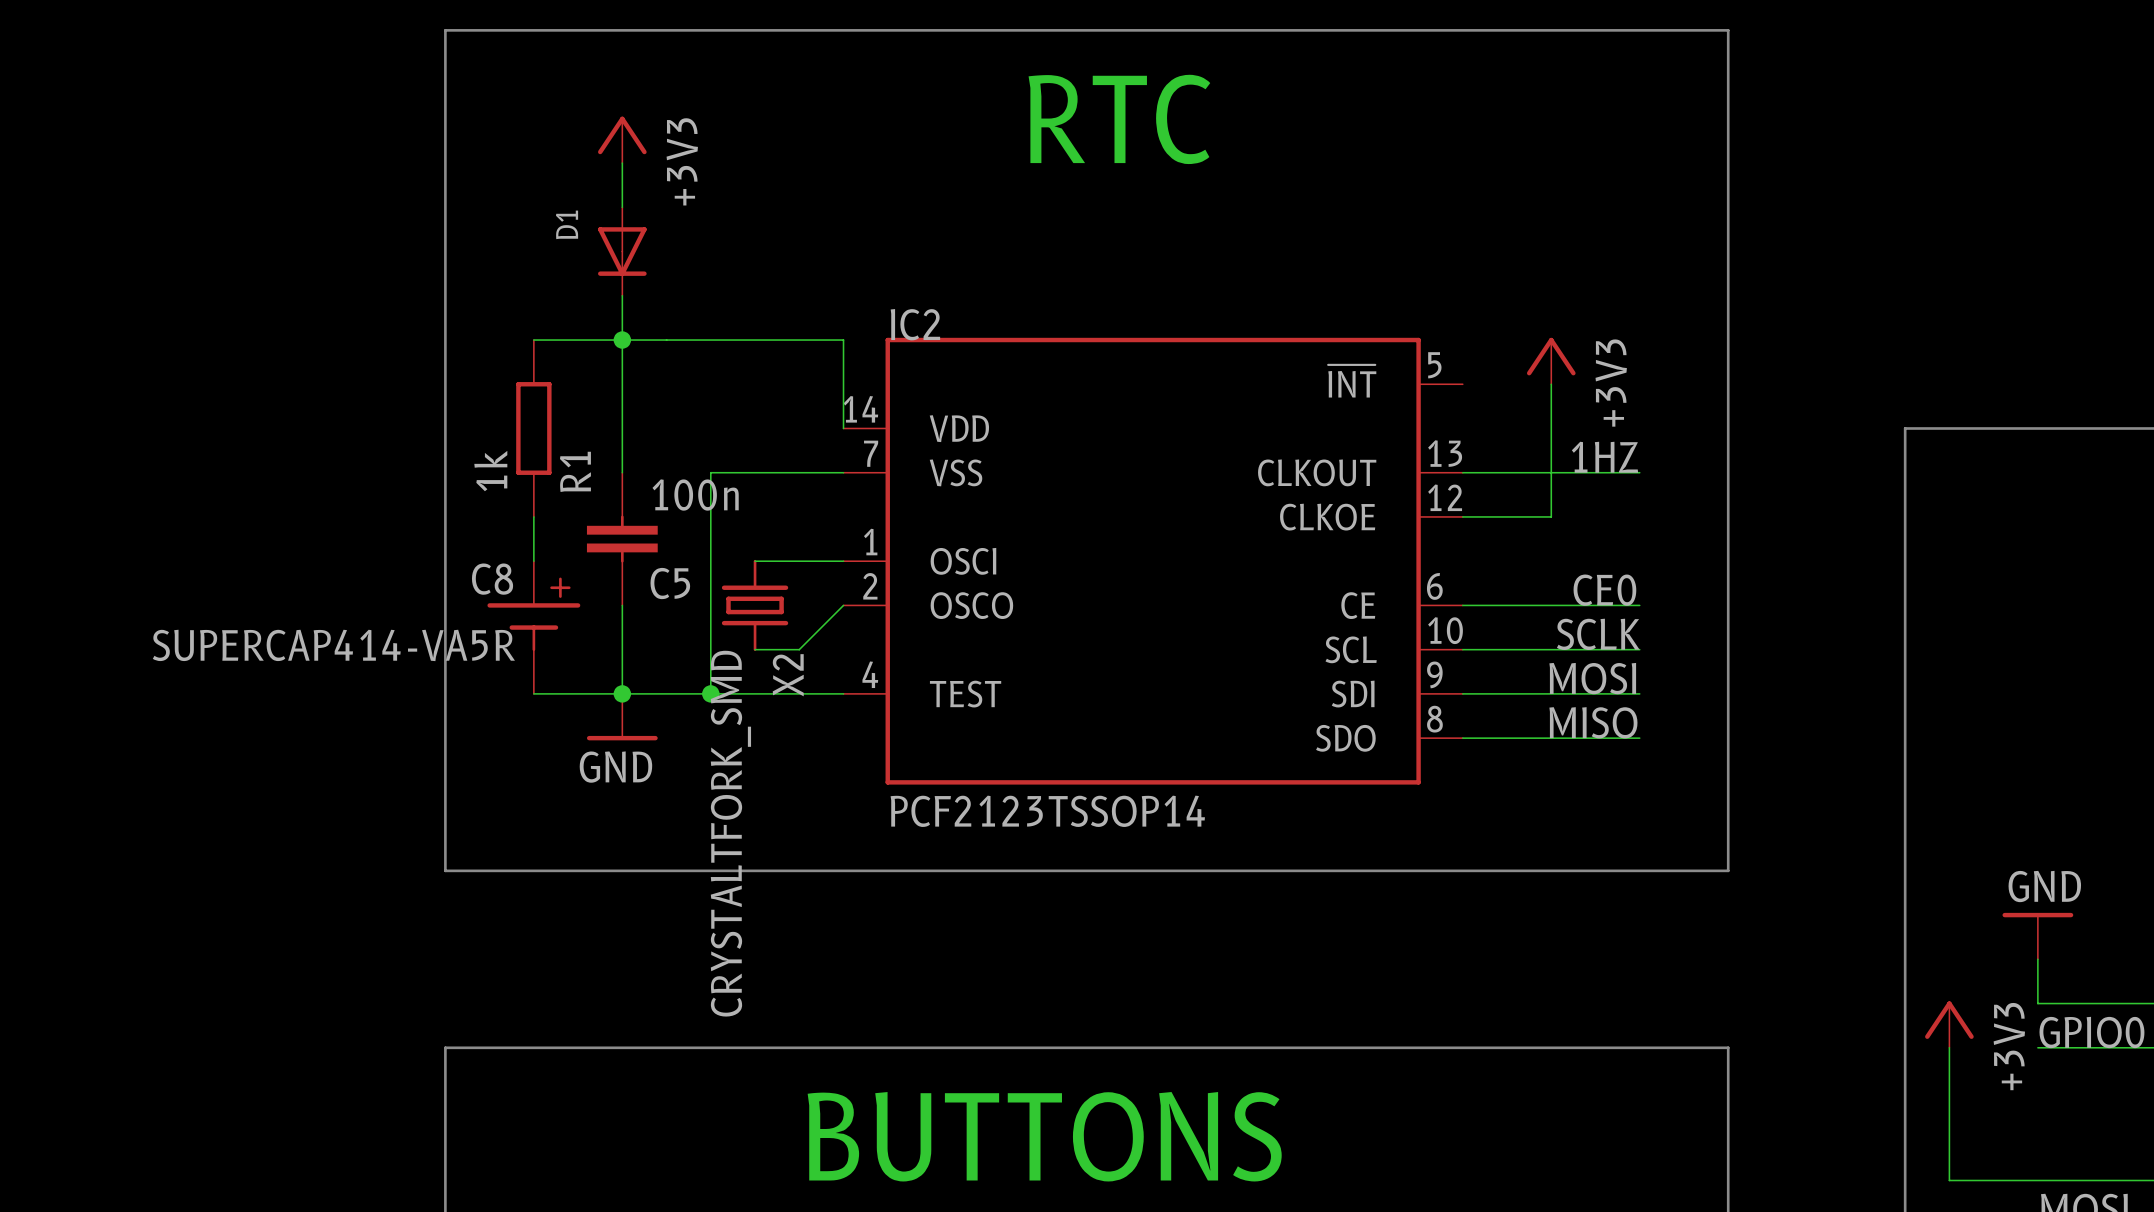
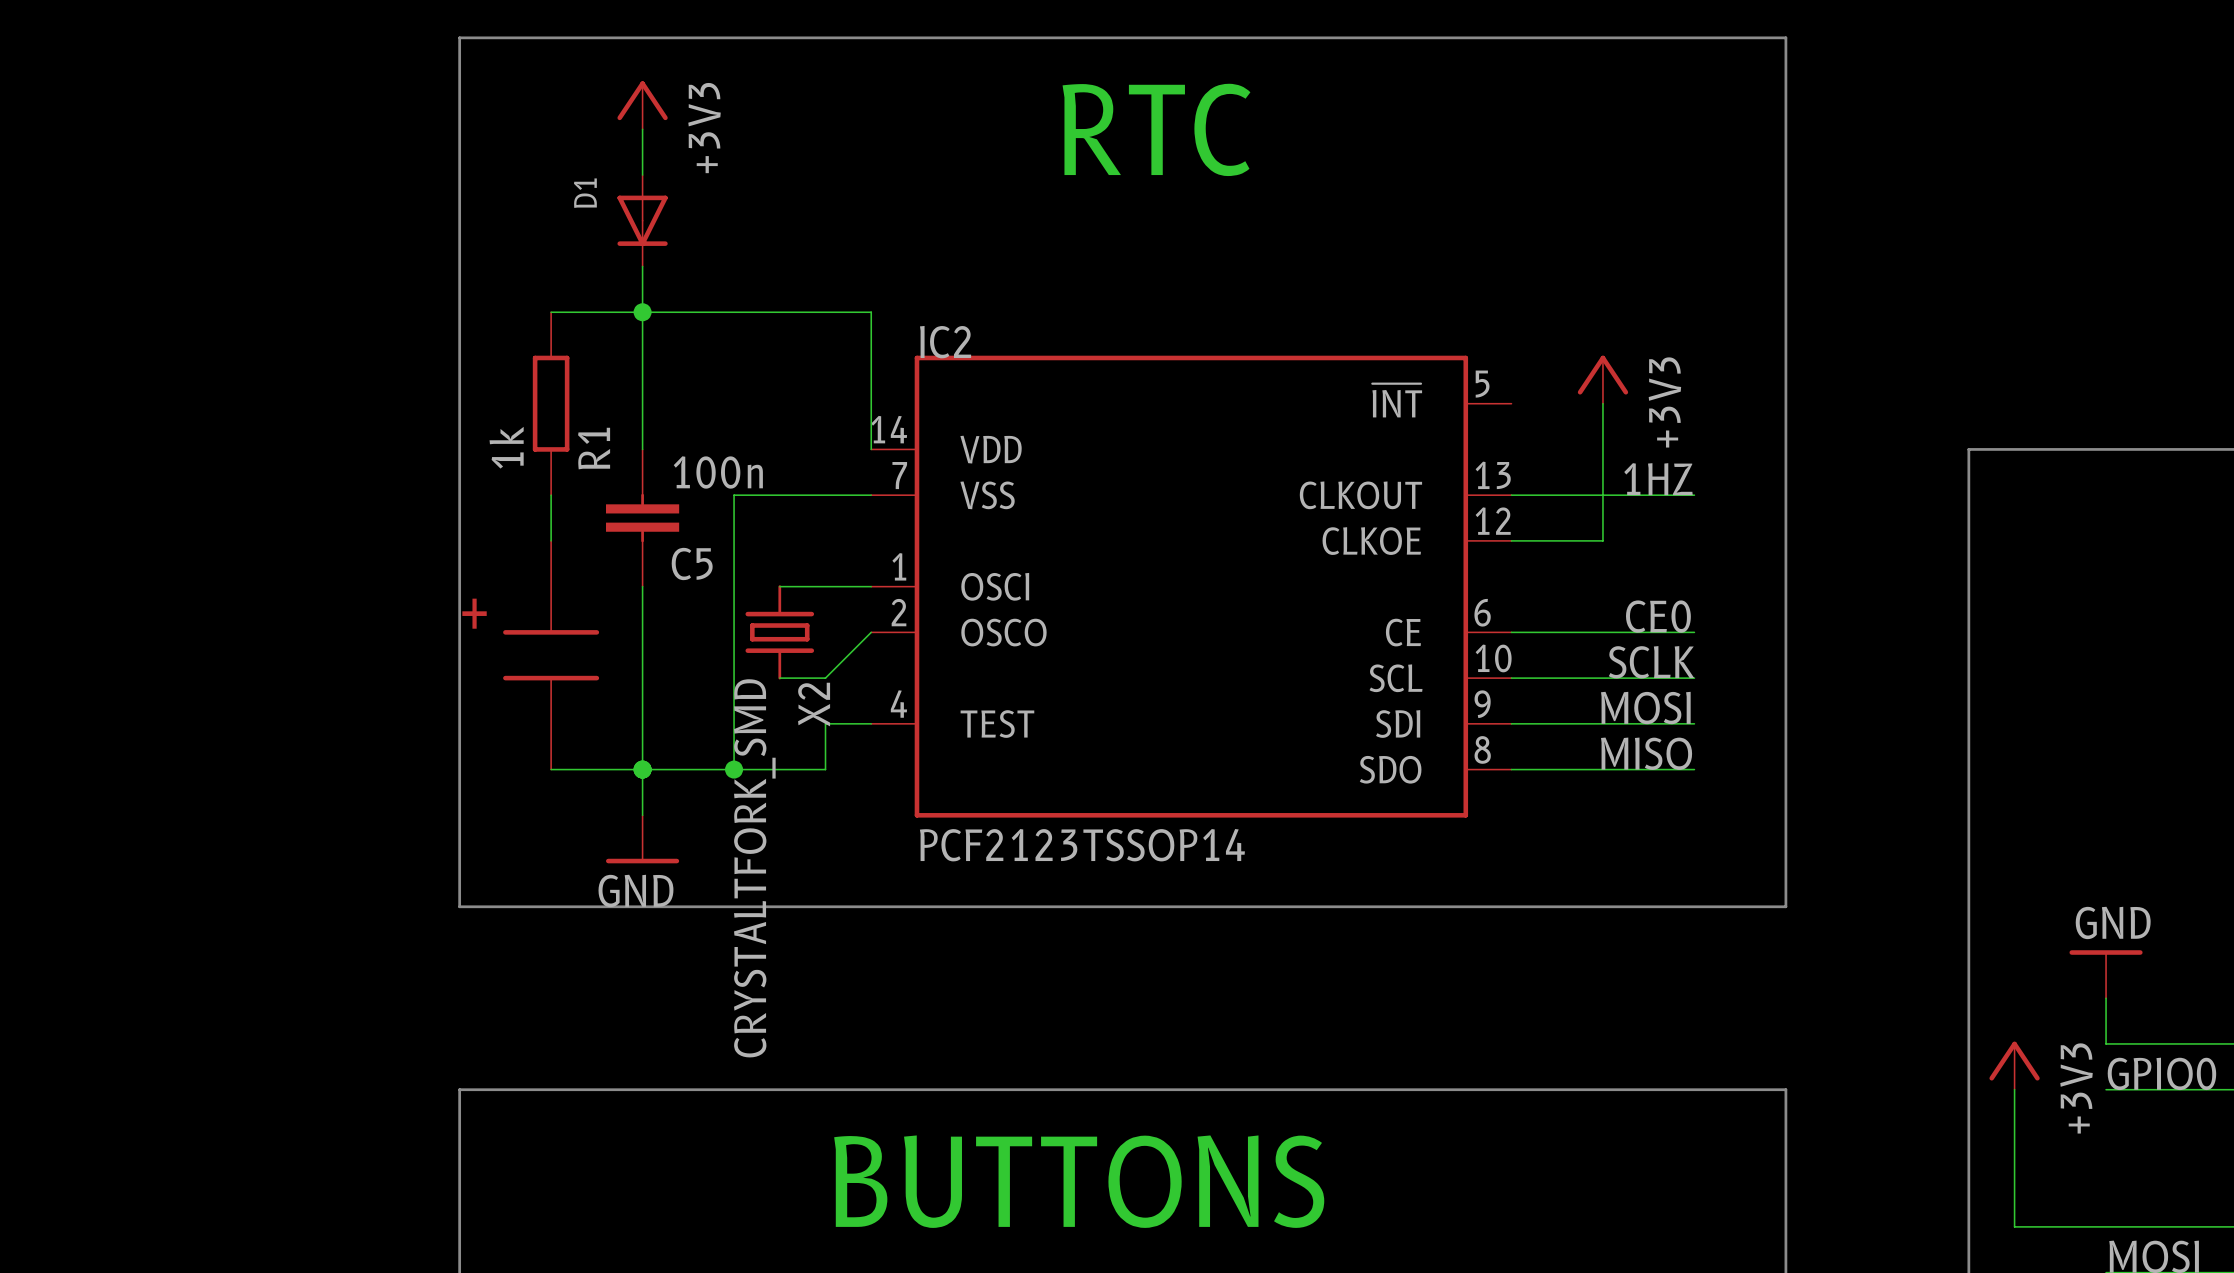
power symbol position: +3V3 (622, 139) -> +3V3 (642, 105)
D1 position: (622, 251) -> (642, 220)
wire: (533, 340) (843, 340) -> (551, 312) (871, 312) (871, 357)
junction position: (622, 340) -> (642, 312)
R1 position: (533, 428) -> (551, 403)
C5 position: (622, 539) -> (642, 518)
C8: SUPERCAP414-VA5R (533, 627) -> none
part: none -> (551, 655)
wire: (533, 693) (799, 693) -> (551, 769) (825, 769) (825, 723)
junction position: (622, 693) -> (642, 769)
wire: none -> (734, 723) (734, 769)
junction position: (710, 693) -> (734, 769)
power symbol position: GND (622, 717) -> GND (642, 839)

